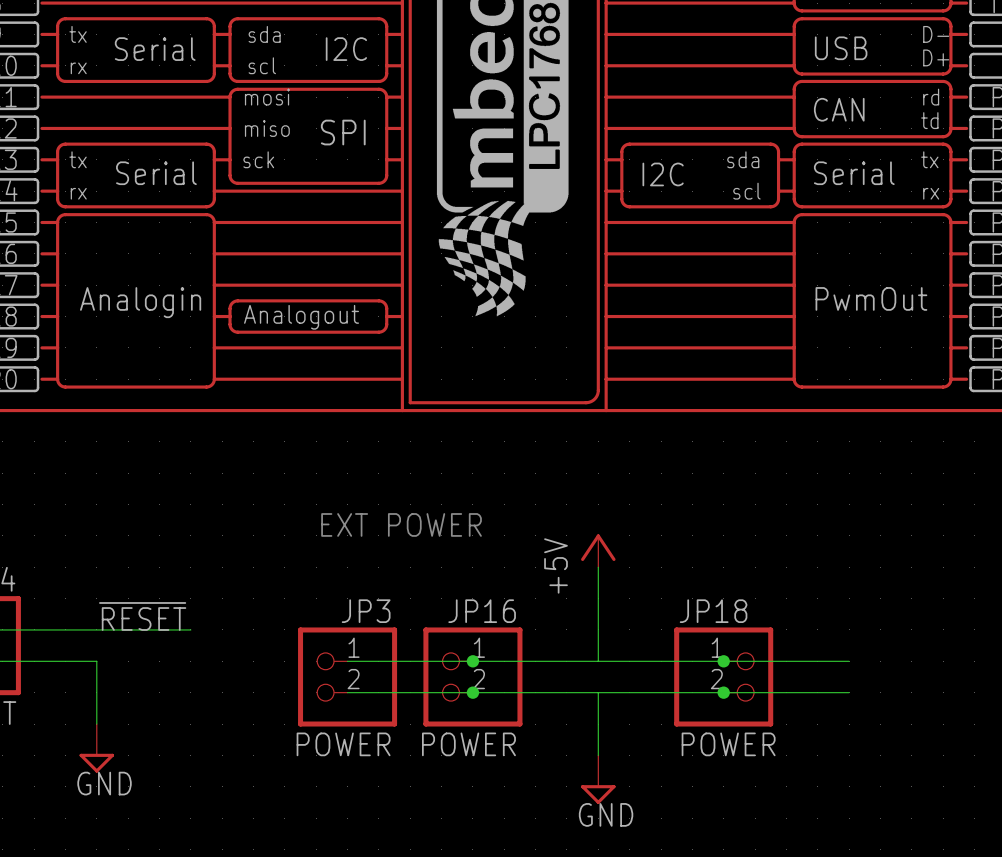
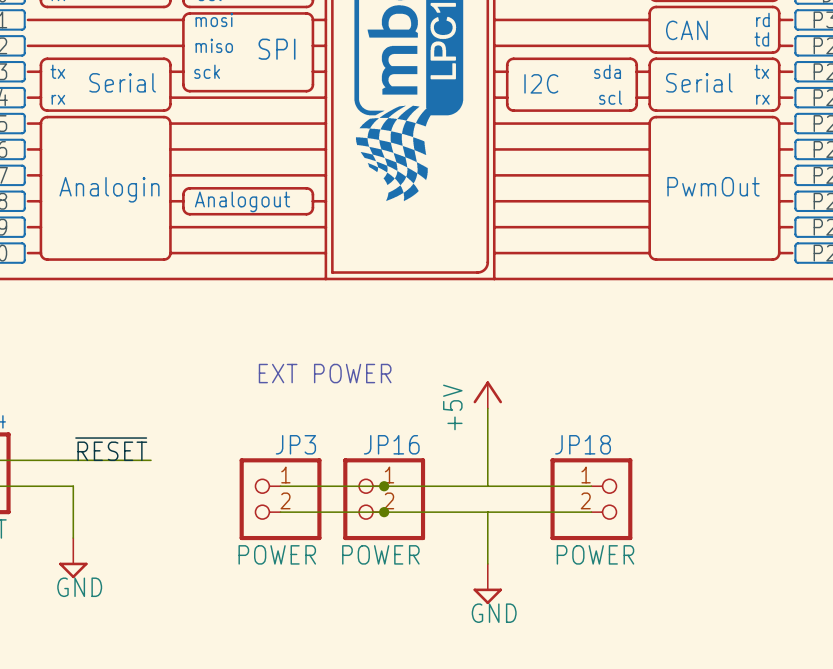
wire: (723, 661) (849, 661) -> none
junction: (723, 661) -> none
wire: (723, 692) (849, 692) -> none
junction: (723, 692) -> none

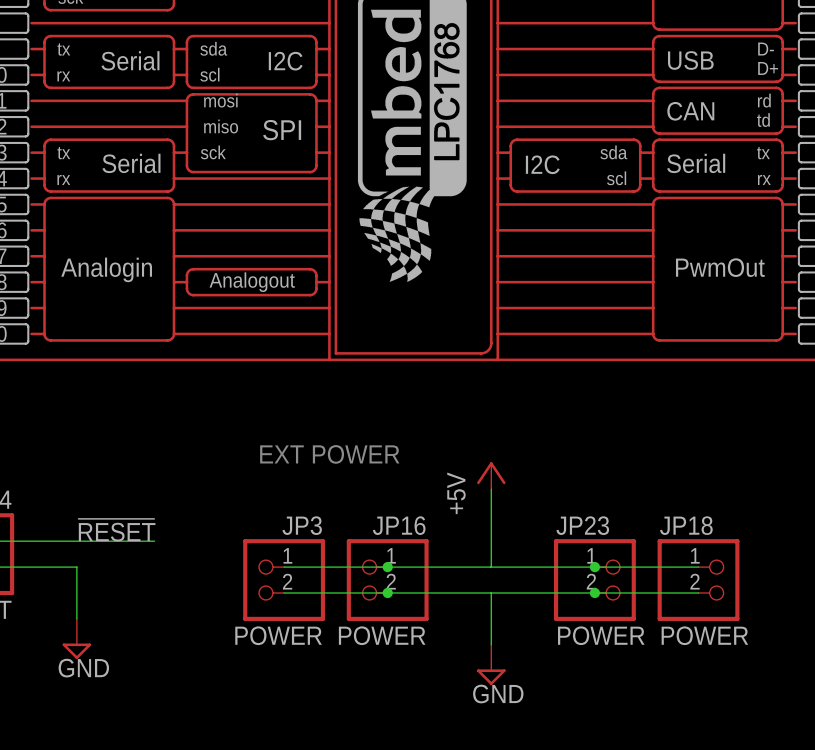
JP18 name: JP18 (583, 444) -> JP23 (582, 525)
wire: none -> (594, 567) (698, 567)
junction: none -> (594, 567)
JP18: none -> POWER (698, 580)
wire: none -> (594, 592) (698, 592)
junction: none -> (594, 592)

